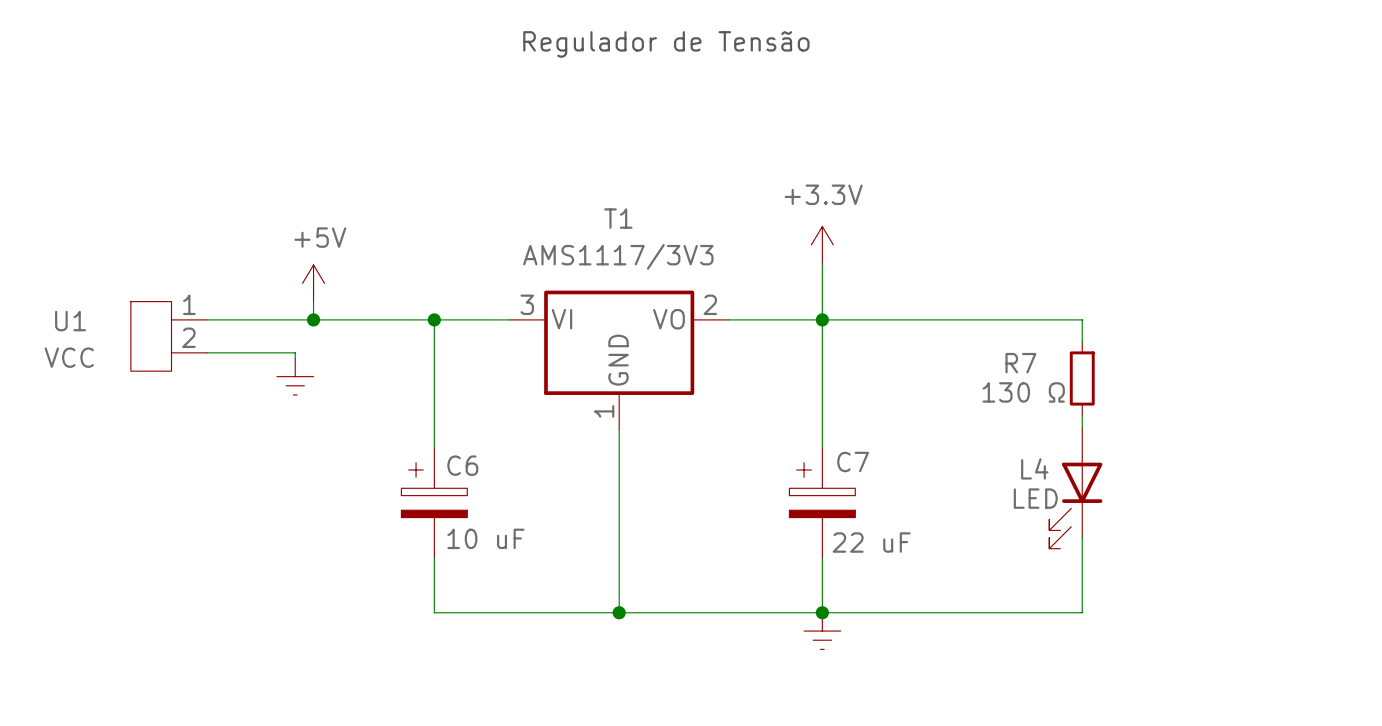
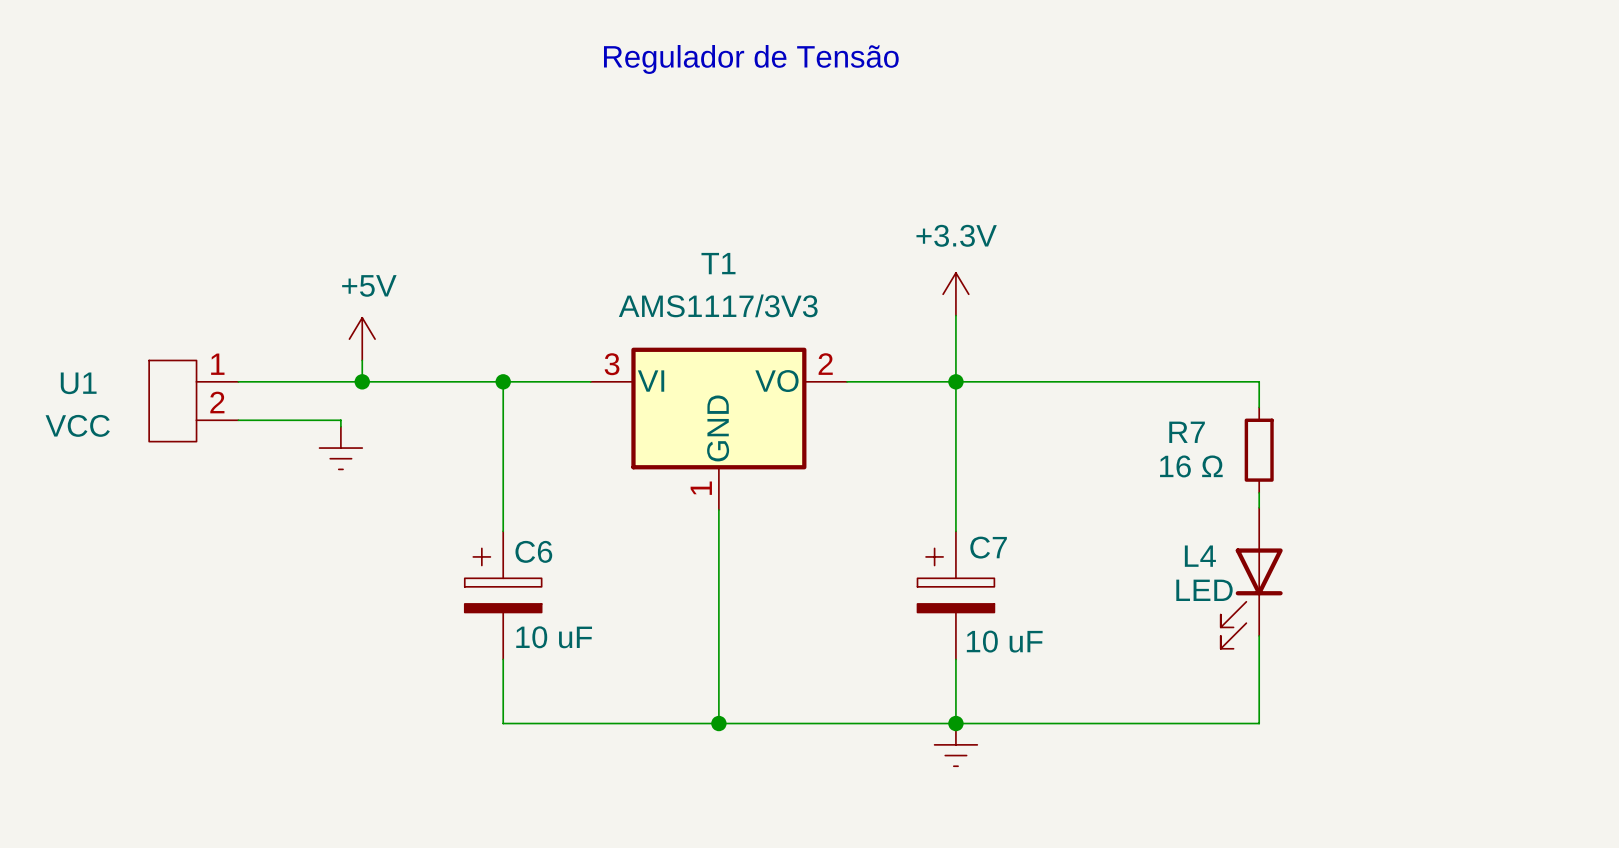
R7 value: 130 Ω (1023, 392) -> 16 Ω (1191, 466)
C7 value: 22 uF (871, 542) -> 10 uF (1004, 641)

